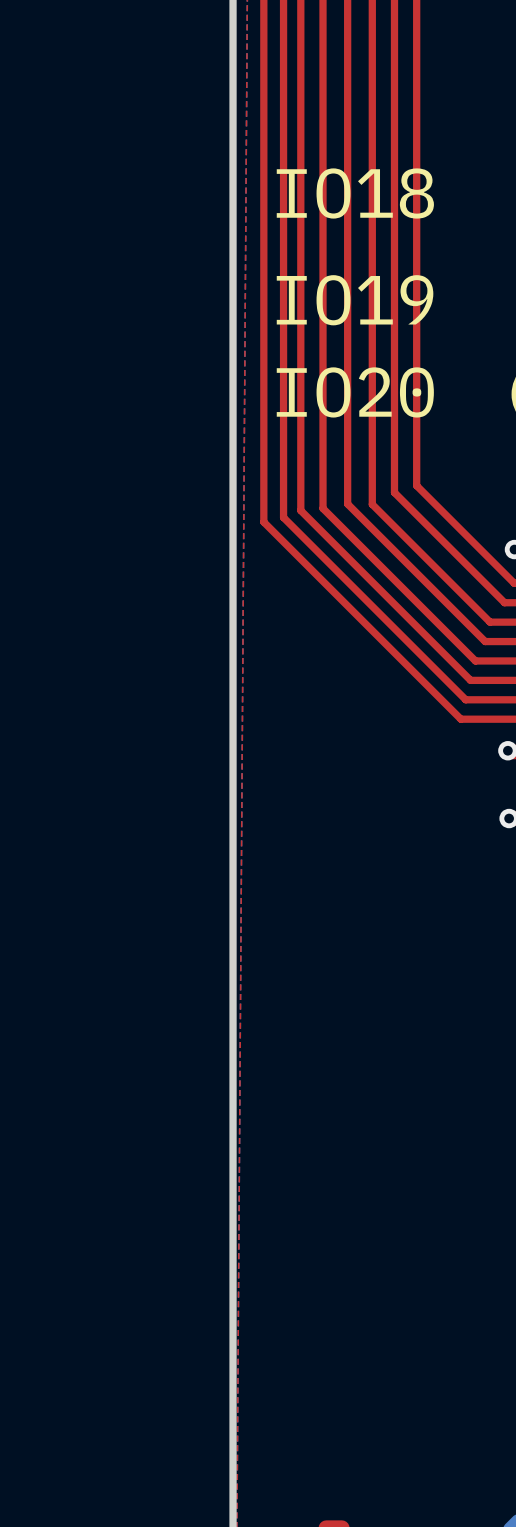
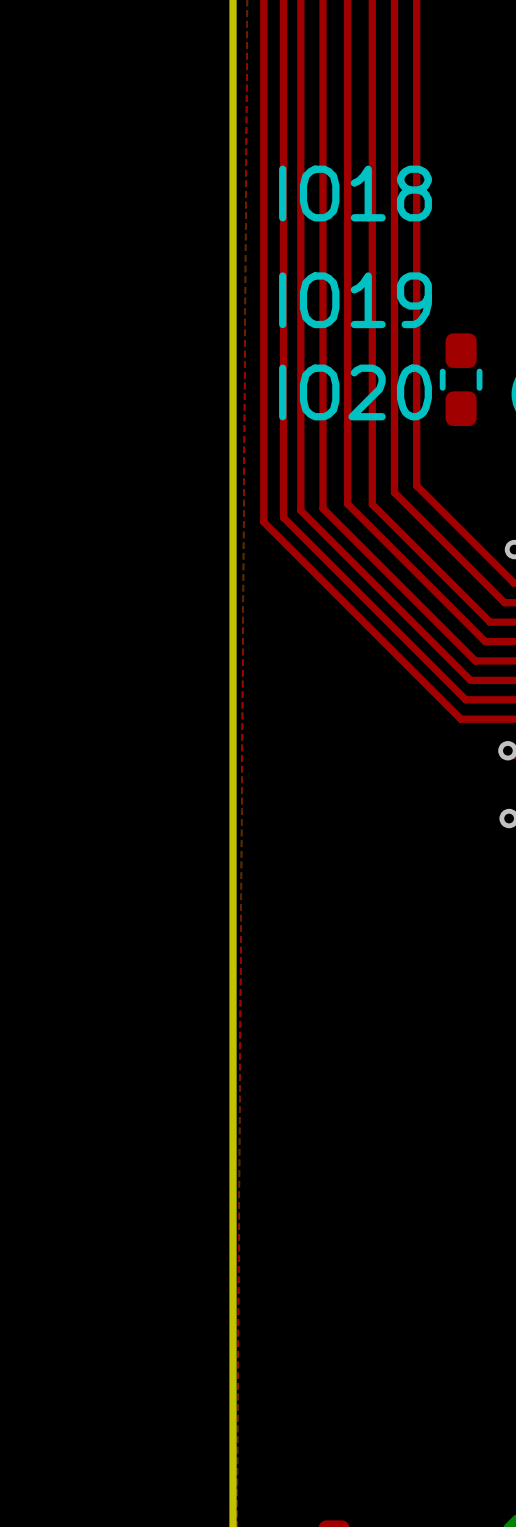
part: none -> (461, 379)

